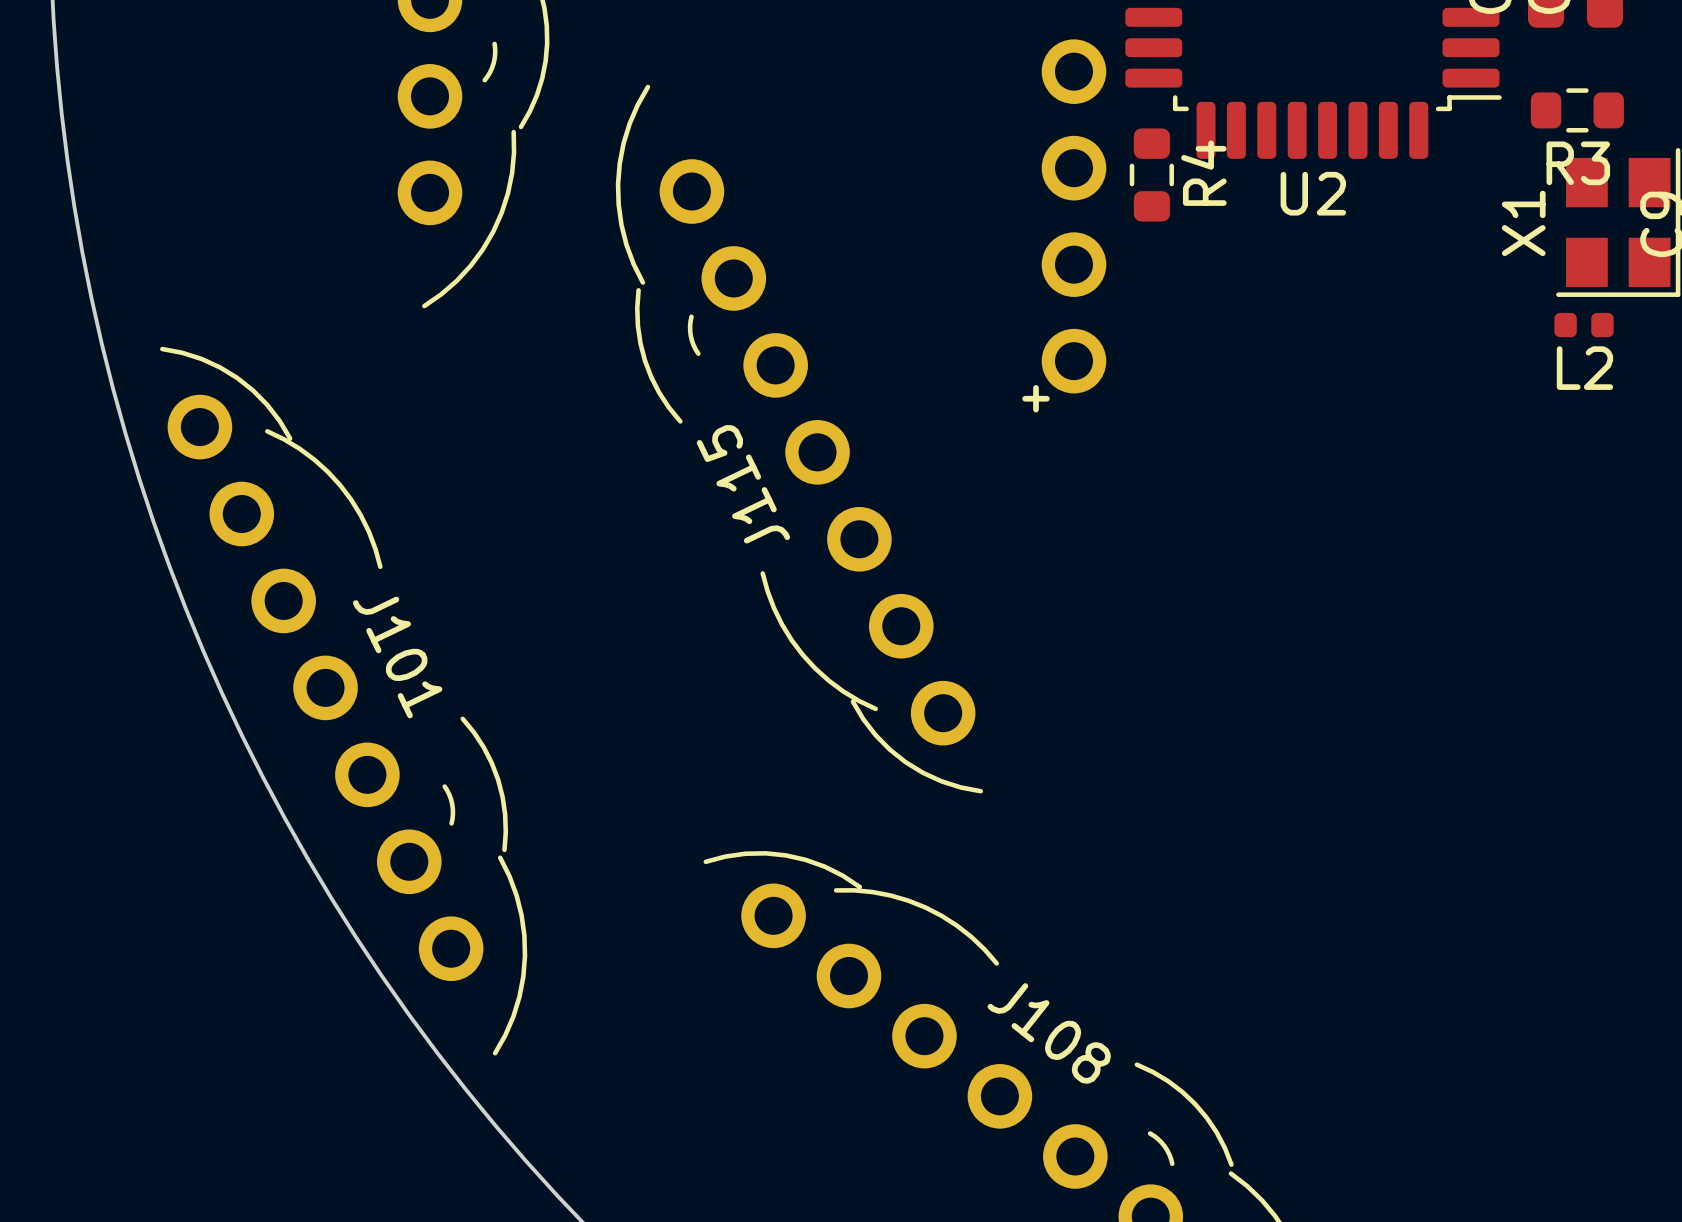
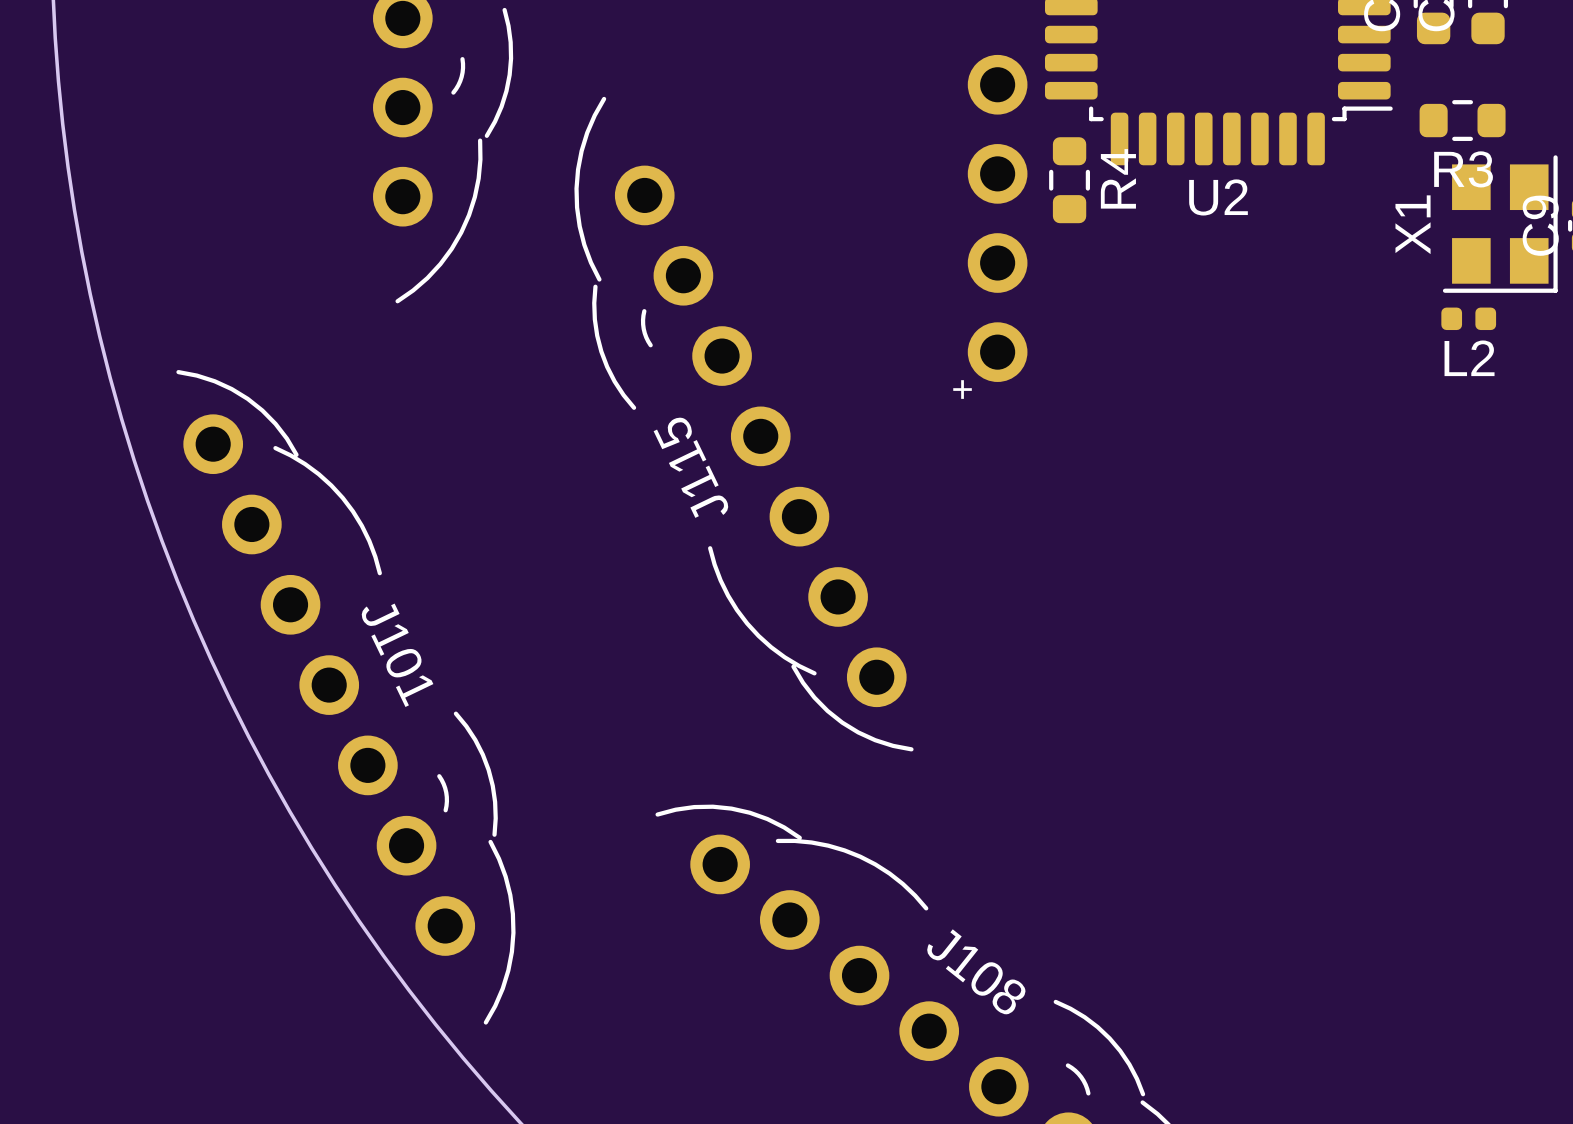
J101 position: (343, 701) -> (345, 697)

